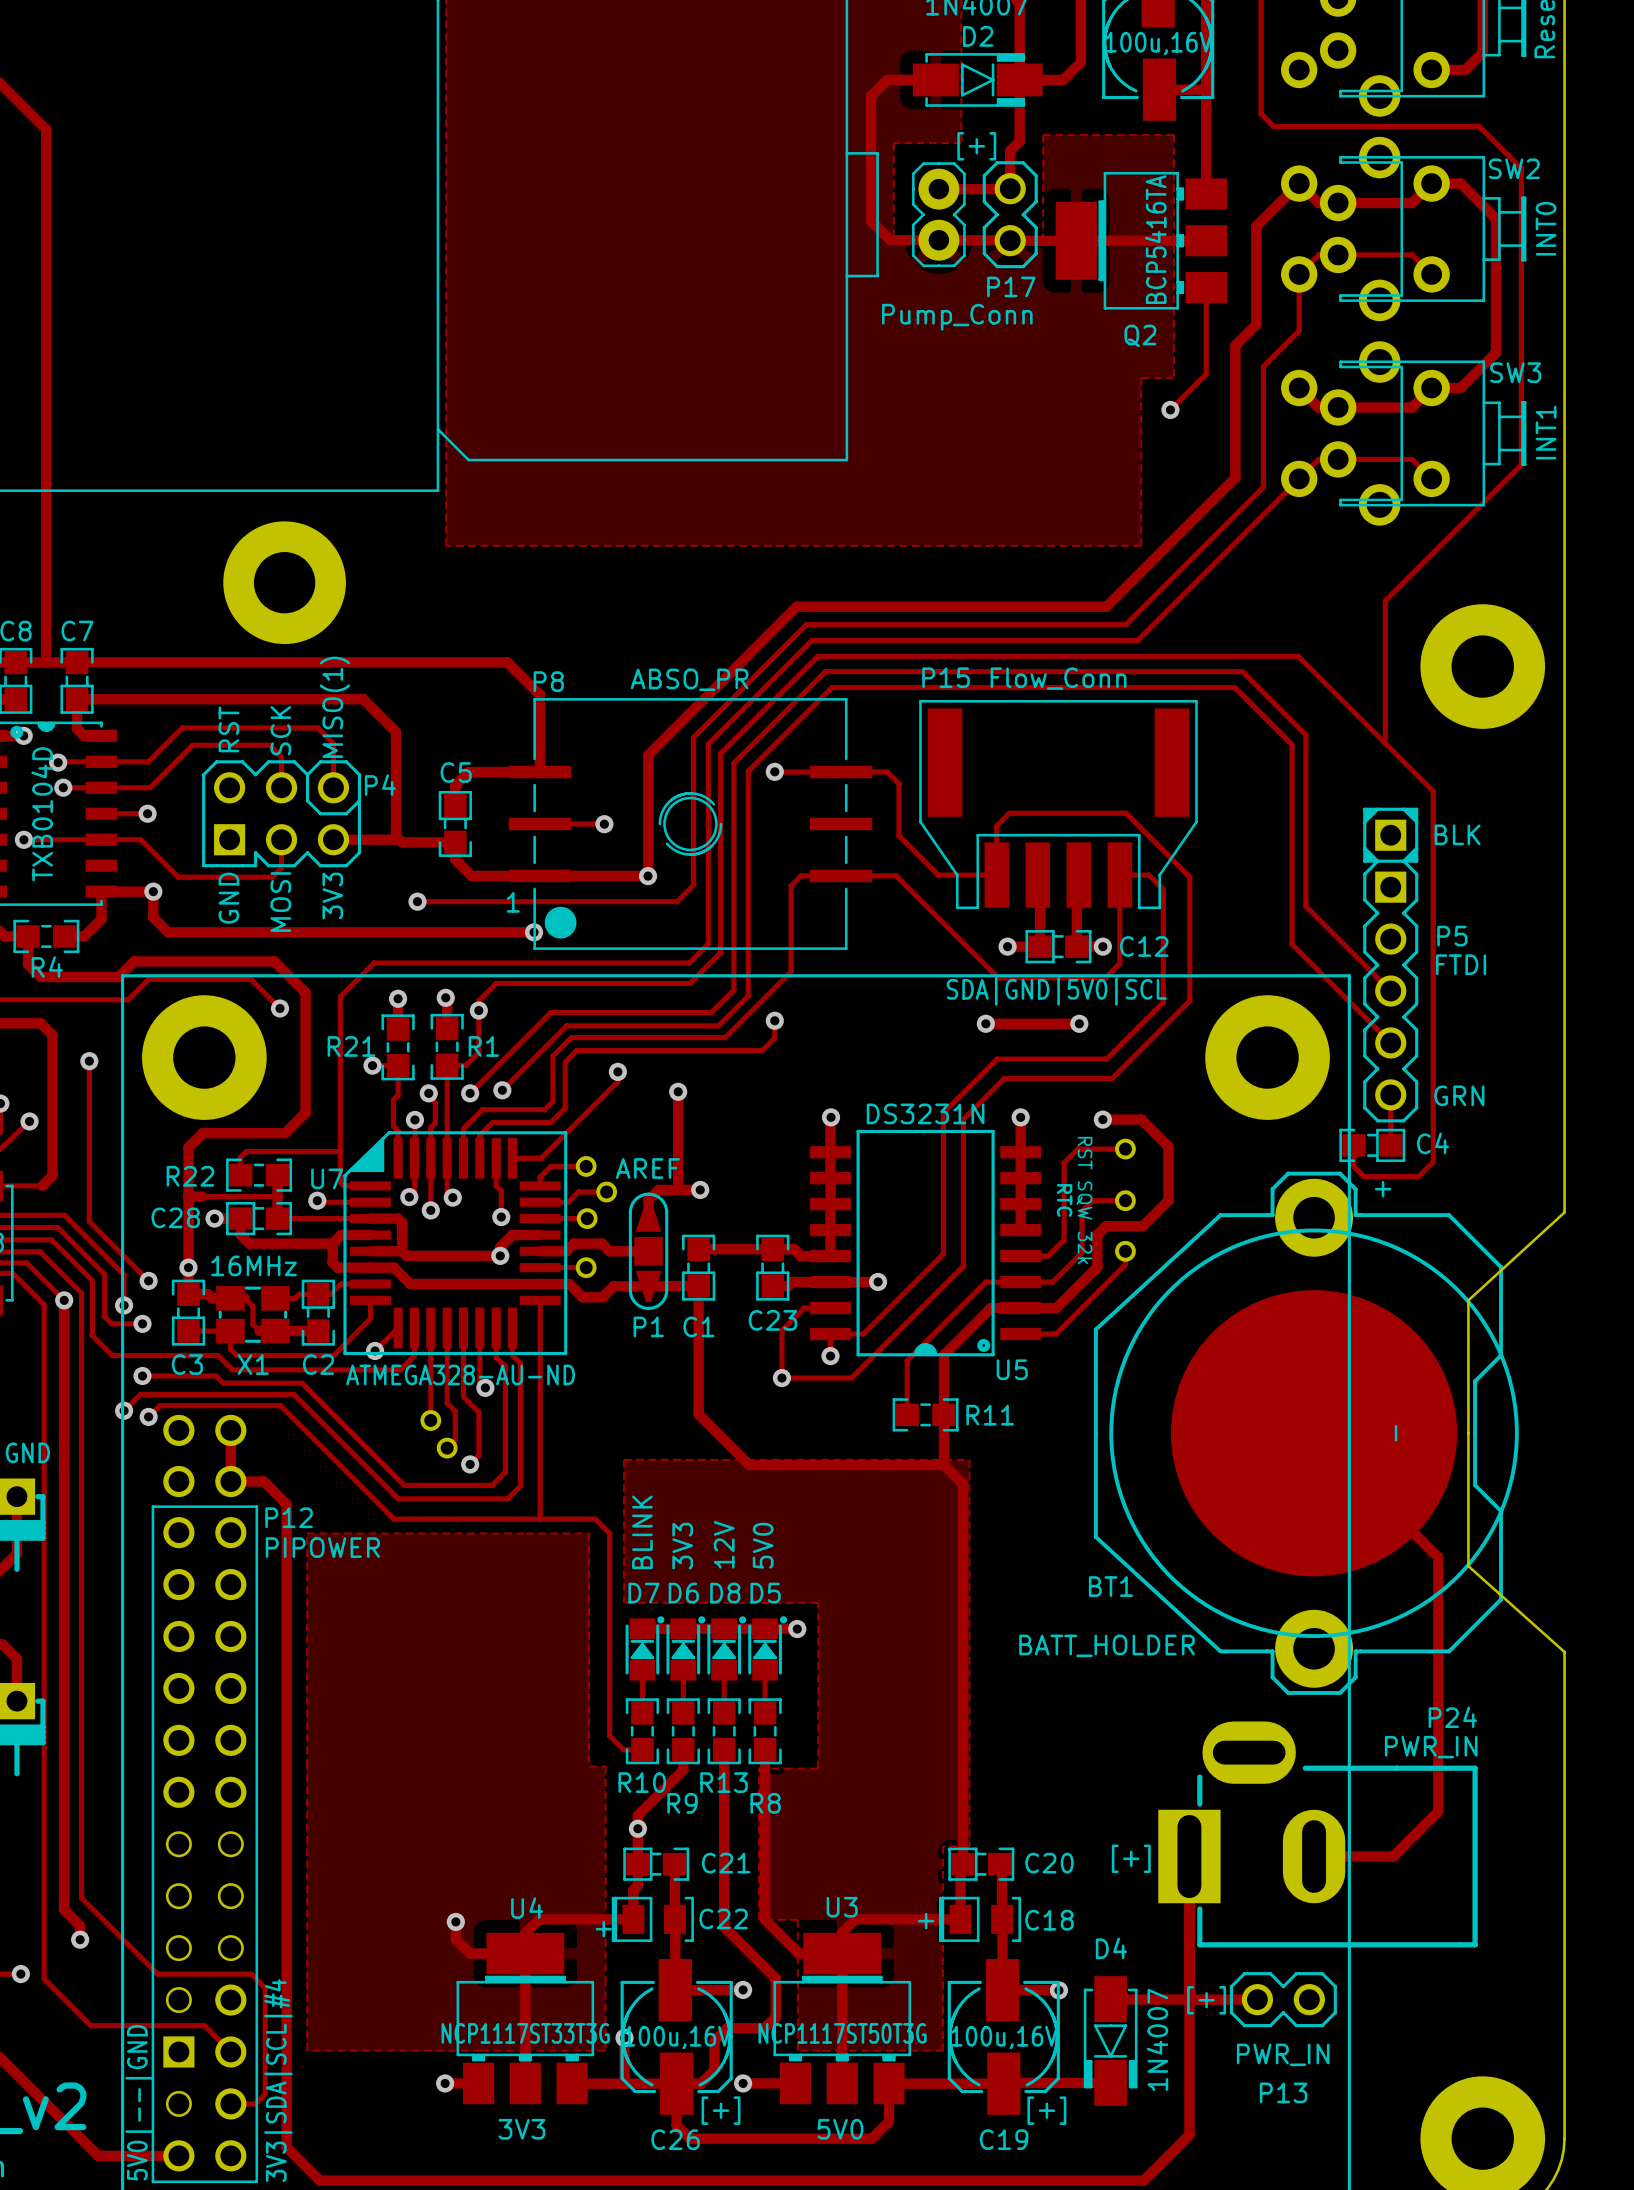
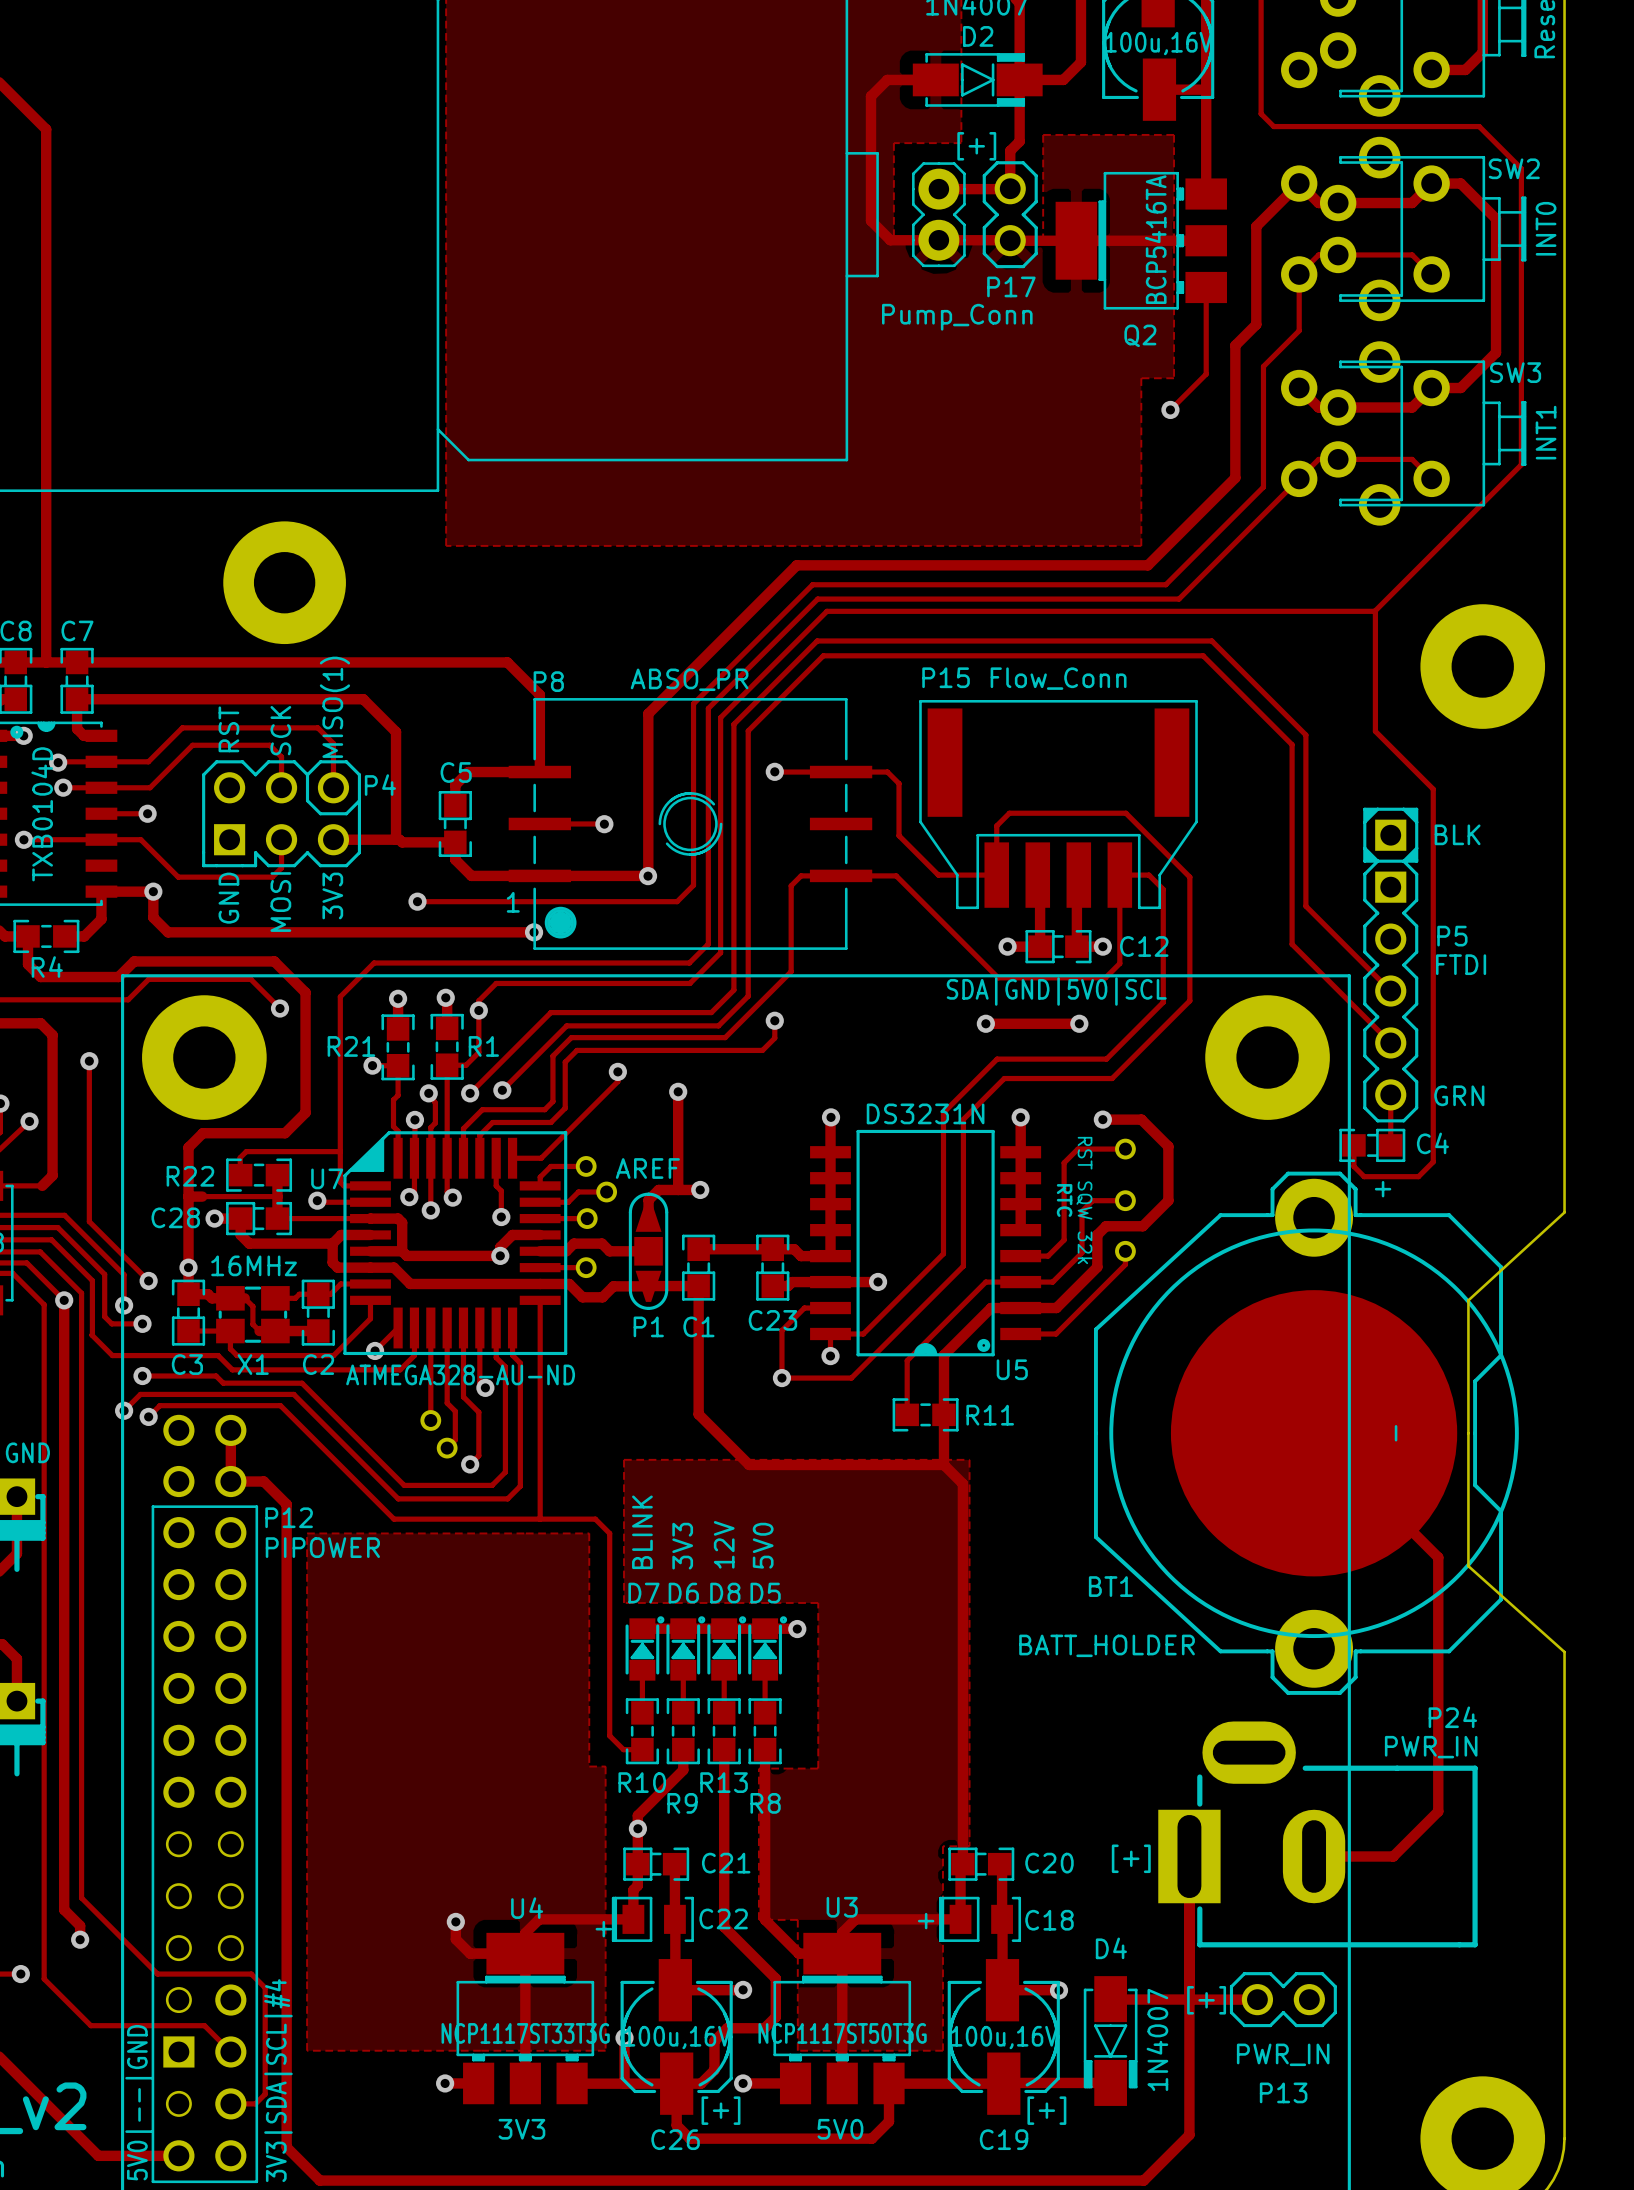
track: (1147, 565) (1106, 606) (796, 606) (648, 755) -> (1147, 565) (796, 565) (648, 713) (648, 755)
track: (1165, 584) (1125, 624) (806, 624) (693, 737) -> (1165, 584) (812, 584) (693, 703) (693, 737)
track: (1179, 599) (1137, 640) (812, 640) (708, 744) -> (1179, 599) (817, 599) (708, 708) (708, 744)
track: (1385, 600) (1385, 743) -> (1385, 600) (1375, 610) (1375, 731) (1433, 791)
track: (1242, 671) (825, 671) (733, 763) -> (1242, 671) (1211, 640) (817, 640) (733, 724) (733, 763)
track: (1234, 687) (832, 687) (748, 771) -> (1234, 687) (1203, 655) (823, 655) (748, 730) (748, 771)
track: (720, 753) (817, 656) (1298, 656) (1433, 791) -> (720, 753) (720, 717) (826, 611) (1375, 611)

